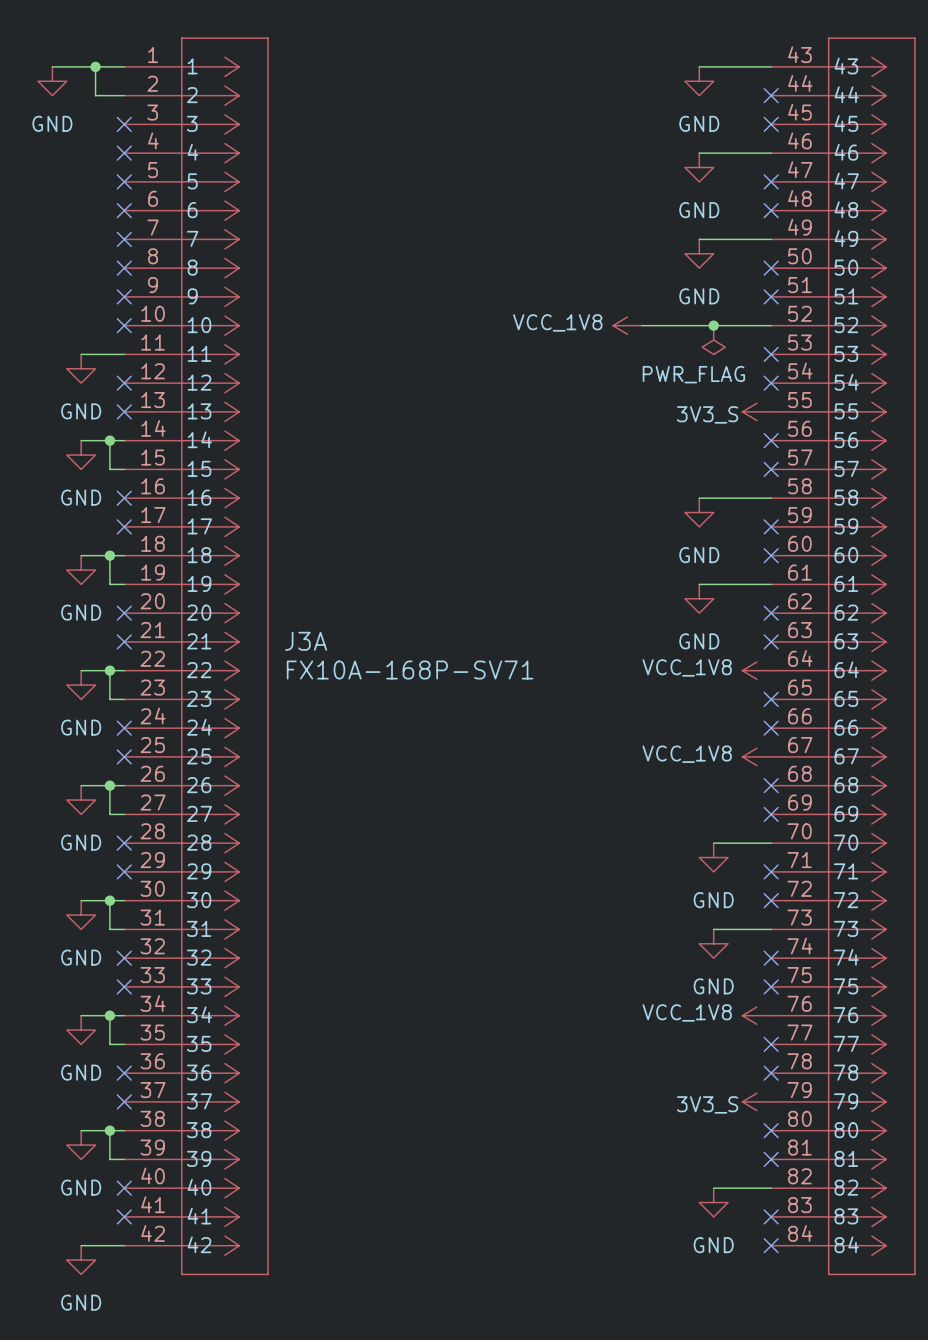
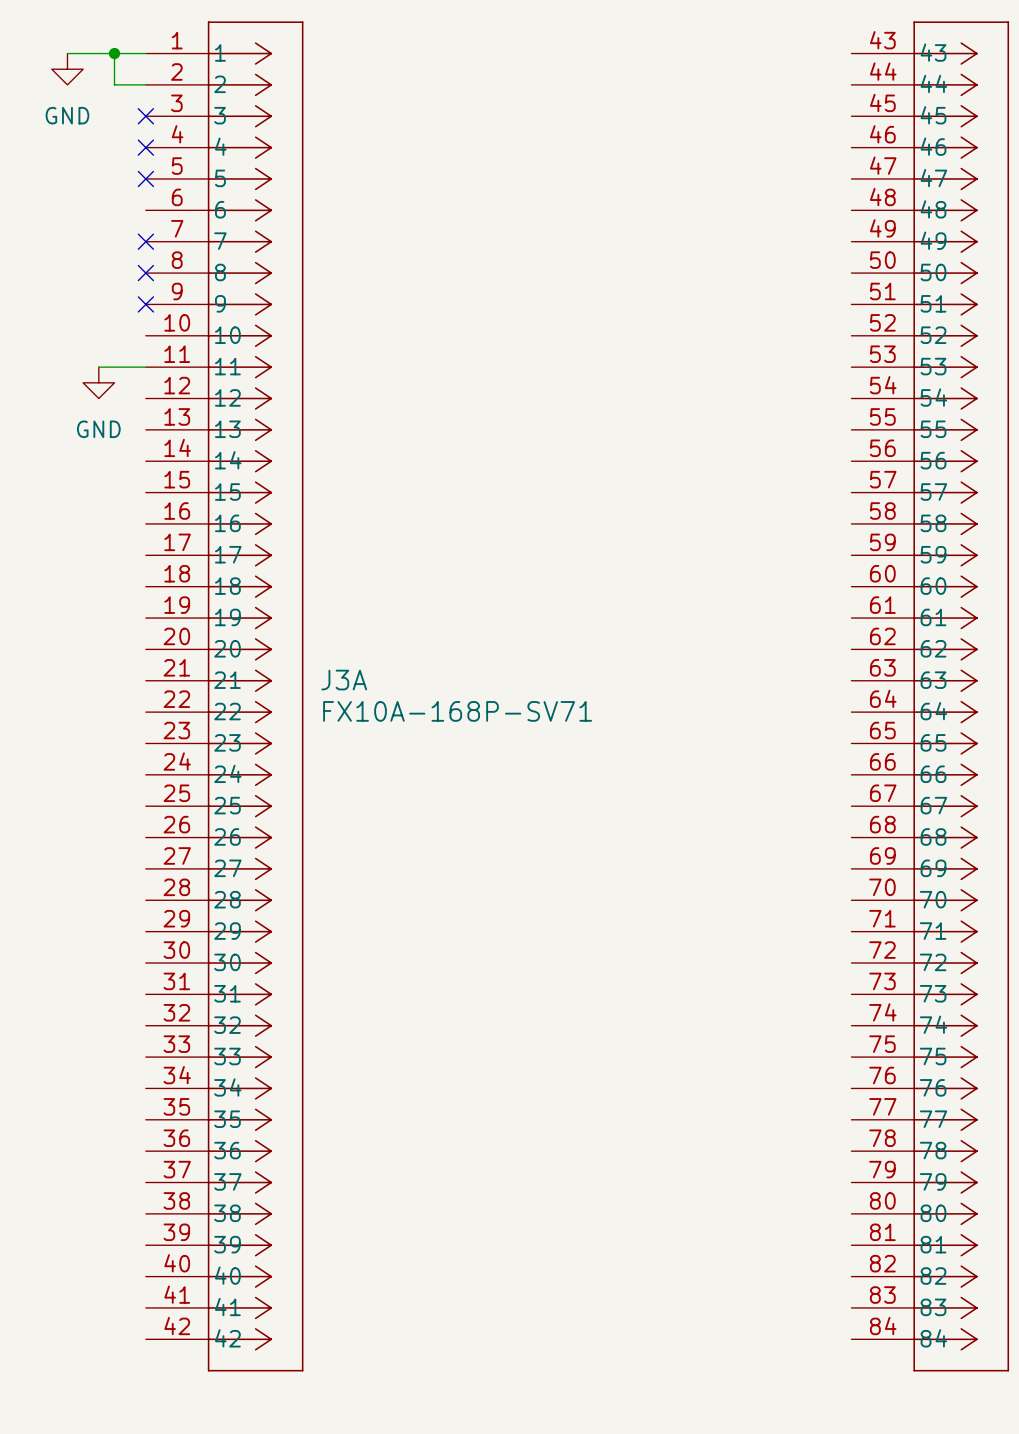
wire: (699, 66) (771, 66) -> none
power symbol: GND (699, 81) -> none
no-connect mark: (771, 95) -> none
no-connect mark: (771, 124) -> none
wire: (699, 153) (771, 153) -> none
power symbol: GND (699, 167) -> none
no-connect mark: (771, 181) -> none
no-connect mark: (124, 210) -> none
no-connect mark: (771, 210) -> none
wire: (699, 239) (771, 239) -> none
power symbol: GND (699, 253) -> none
no-connect mark: (771, 268) -> none
no-connect mark: (771, 296) -> none
no-connect mark: (124, 325) -> none
power symbol: VCC_1V8 (627, 325) -> none
wire: (641, 325) (771, 325) -> none
junction: (713, 325) -> none
power symbol: PWR_FLAG (713, 340) -> none
no-connect mark: (771, 354) -> none
no-connect mark: (124, 383) -> none
no-connect mark: (771, 383) -> none
no-connect mark: (124, 411) -> none
power symbol: 3V3_S (756, 411) -> none
wire: (81, 440) (124, 440) -> none
wire: (109, 440) (109, 469) (124, 469) -> none
junction: (109, 440) -> none
no-connect mark: (771, 440) -> none
power symbol: GND (81, 455) -> none
no-connect mark: (771, 469) -> none
no-connect mark: (124, 498) -> none
wire: (699, 498) (771, 498) -> none
power symbol: GND (699, 512) -> none
no-connect mark: (124, 526) -> none
no-connect mark: (771, 526) -> none
wire: (81, 555) (124, 555) -> none
wire: (109, 555) (109, 584) (124, 584) -> none
junction: (109, 555) -> none
no-connect mark: (771, 555) -> none
power symbol: GND (81, 570) -> none
wire: (699, 584) (771, 584) -> none
power symbol: GND (699, 598) -> none
no-connect mark: (124, 613) -> none
no-connect mark: (771, 613) -> none
no-connect mark: (124, 641) -> none
no-connect mark: (771, 641) -> none
wire: (81, 670) (124, 670) -> none
wire: (109, 670) (109, 699) (124, 699) -> none
junction: (109, 670) -> none
power symbol: VCC_1V8 (756, 670) -> none
power symbol: GND (81, 685) -> none
no-connect mark: (771, 699) -> none
no-connect mark: (124, 728) -> none
no-connect mark: (771, 728) -> none
no-connect mark: (124, 756) -> none
power symbol: VCC_1V8 (756, 756) -> none
wire: (81, 785) (124, 785) -> none
wire: (109, 785) (109, 814) (124, 814) -> none
junction: (109, 785) -> none
no-connect mark: (771, 785) -> none
power symbol: GND (81, 800) -> none
no-connect mark: (771, 814) -> none
no-connect mark: (124, 843) -> none
wire: (713, 843) (771, 843) -> none
power symbol: GND (713, 857) -> none
no-connect mark: (124, 871) -> none
no-connect mark: (771, 871) -> none
wire: (81, 900) (124, 900) -> none
wire: (109, 900) (109, 929) (124, 929) -> none
junction: (109, 900) -> none
no-connect mark: (771, 900) -> none
power symbol: GND (81, 915) -> none
wire: (713, 929) (771, 929) -> none
power symbol: GND (713, 943) -> none
no-connect mark: (124, 958) -> none
no-connect mark: (771, 958) -> none
no-connect mark: (124, 986) -> none
no-connect mark: (771, 986) -> none
wire: (81, 1015) (124, 1015) -> none
wire: (109, 1015) (109, 1044) (124, 1044) -> none
junction: (109, 1015) -> none
power symbol: VCC_1V8 (756, 1015) -> none
power symbol: GND (81, 1030) -> none
no-connect mark: (771, 1044) -> none
no-connect mark: (124, 1073) -> none
no-connect mark: (771, 1073) -> none
no-connect mark: (124, 1101) -> none
power symbol: 3V3_S (756, 1101) -> none
wire: (81, 1130) (124, 1130) -> none
wire: (109, 1130) (109, 1159) (124, 1159) -> none
junction: (109, 1130) -> none
no-connect mark: (771, 1130) -> none
power symbol: GND (81, 1145) -> none
no-connect mark: (771, 1159) -> none
no-connect mark: (124, 1188) -> none
wire: (713, 1188) (771, 1188) -> none
power symbol: GND (713, 1202) -> none
no-connect mark: (124, 1216) -> none
no-connect mark: (771, 1216) -> none
wire: (81, 1245) (124, 1245) -> none
no-connect mark: (771, 1245) -> none
power symbol: GND (81, 1260) -> none

